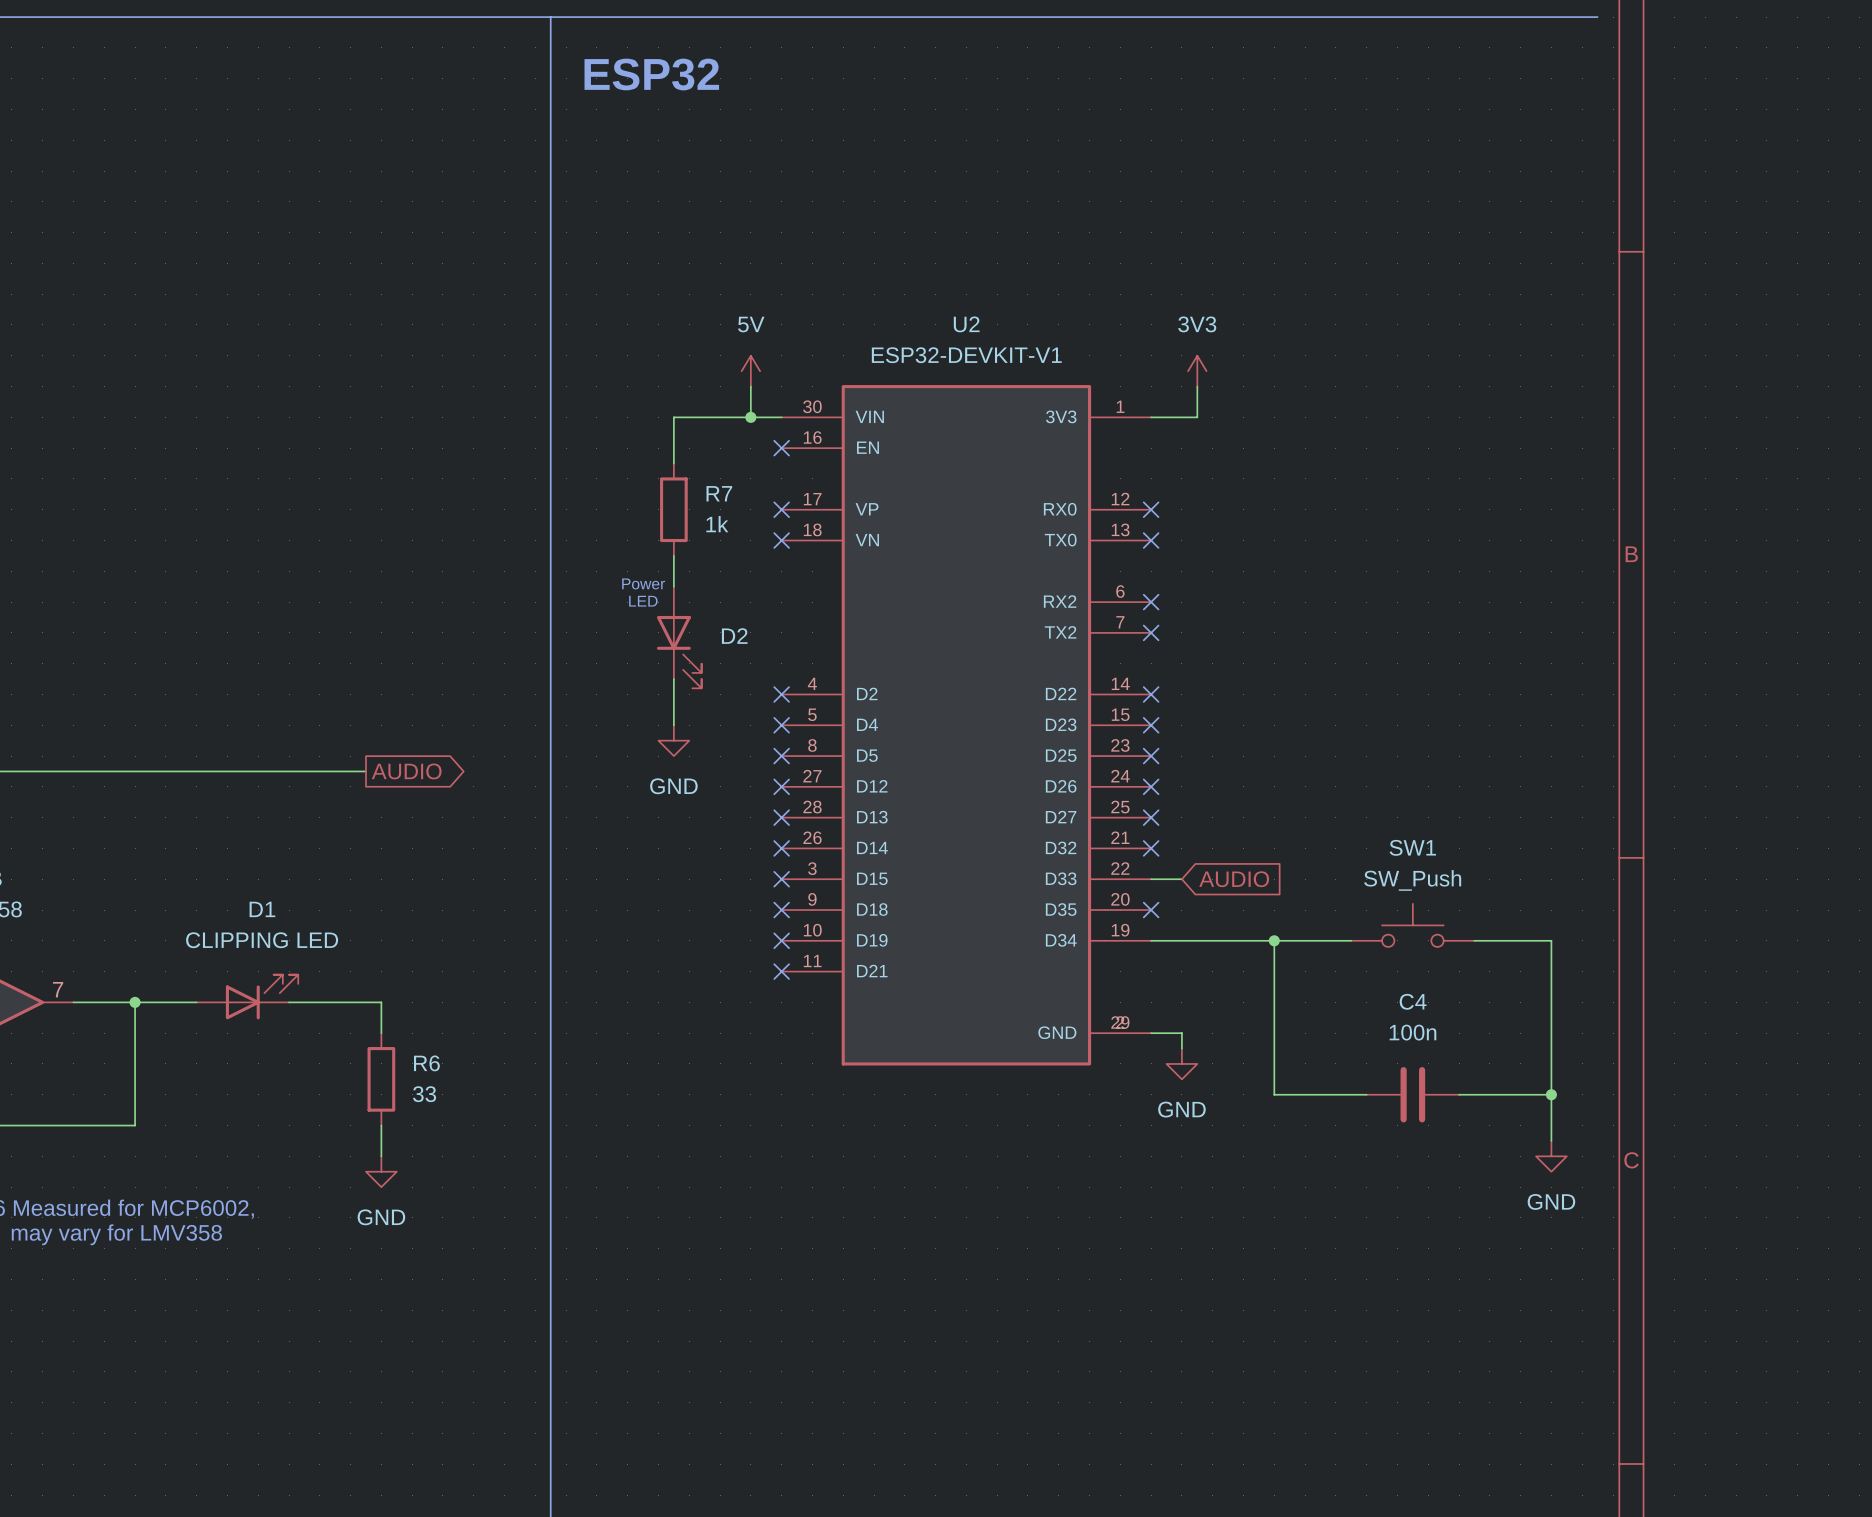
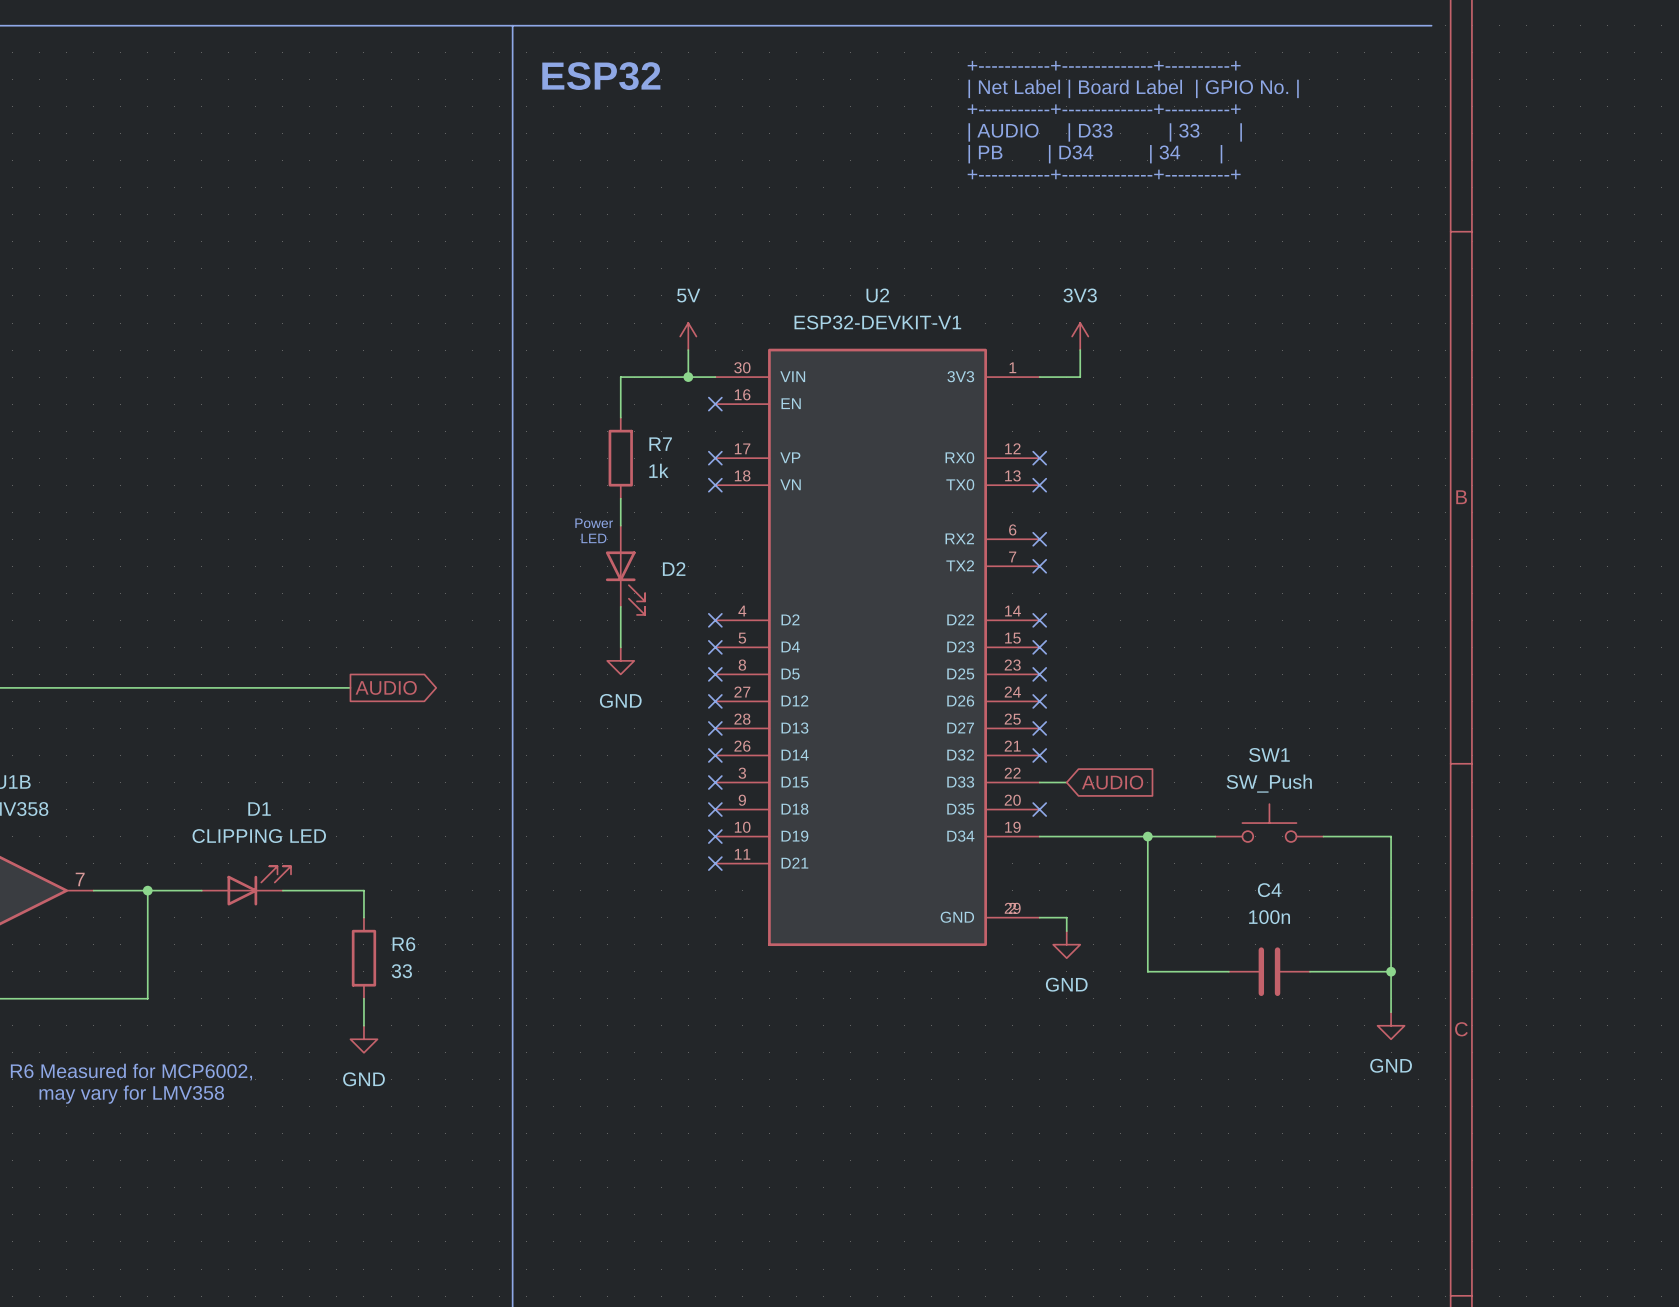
text: none -> +-----------+--------------+----------+ (1104, 65)
text: none -> | Net Label | Board Label | GPIO No. | (1133, 88)
text: none -> +-----------+--------------+----------+ (1104, 109)
text: none -> | AUDIO | D33 | 33 | (1105, 132)
text: none -> | PB | D34 | 34 | (1095, 154)
text: none -> +-----------+--------------+----------+ (1104, 174)

